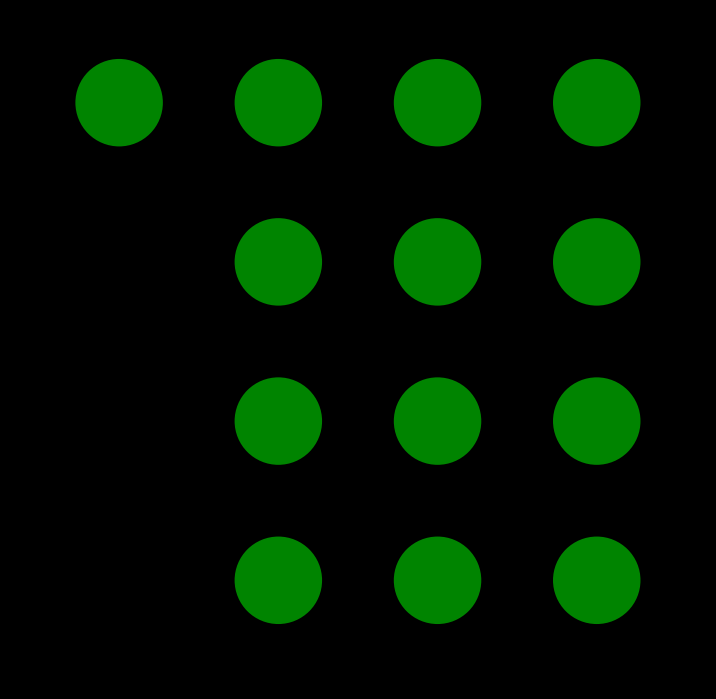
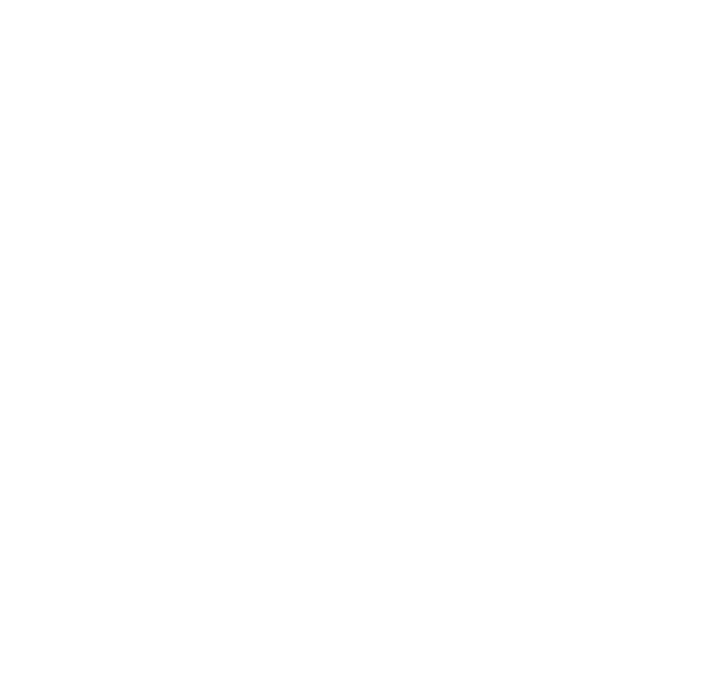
part: (119, 102) -> none
part: (278, 102) -> none
part: (437, 102) -> none
part: (596, 102) -> none
part: (278, 261) -> none
part: (437, 261) -> none
part: (596, 261) -> none
part: (278, 421) -> none
part: (437, 421) -> none
part: (596, 421) -> none
part: (278, 580) -> none
part: (437, 580) -> none
part: (596, 580) -> none

